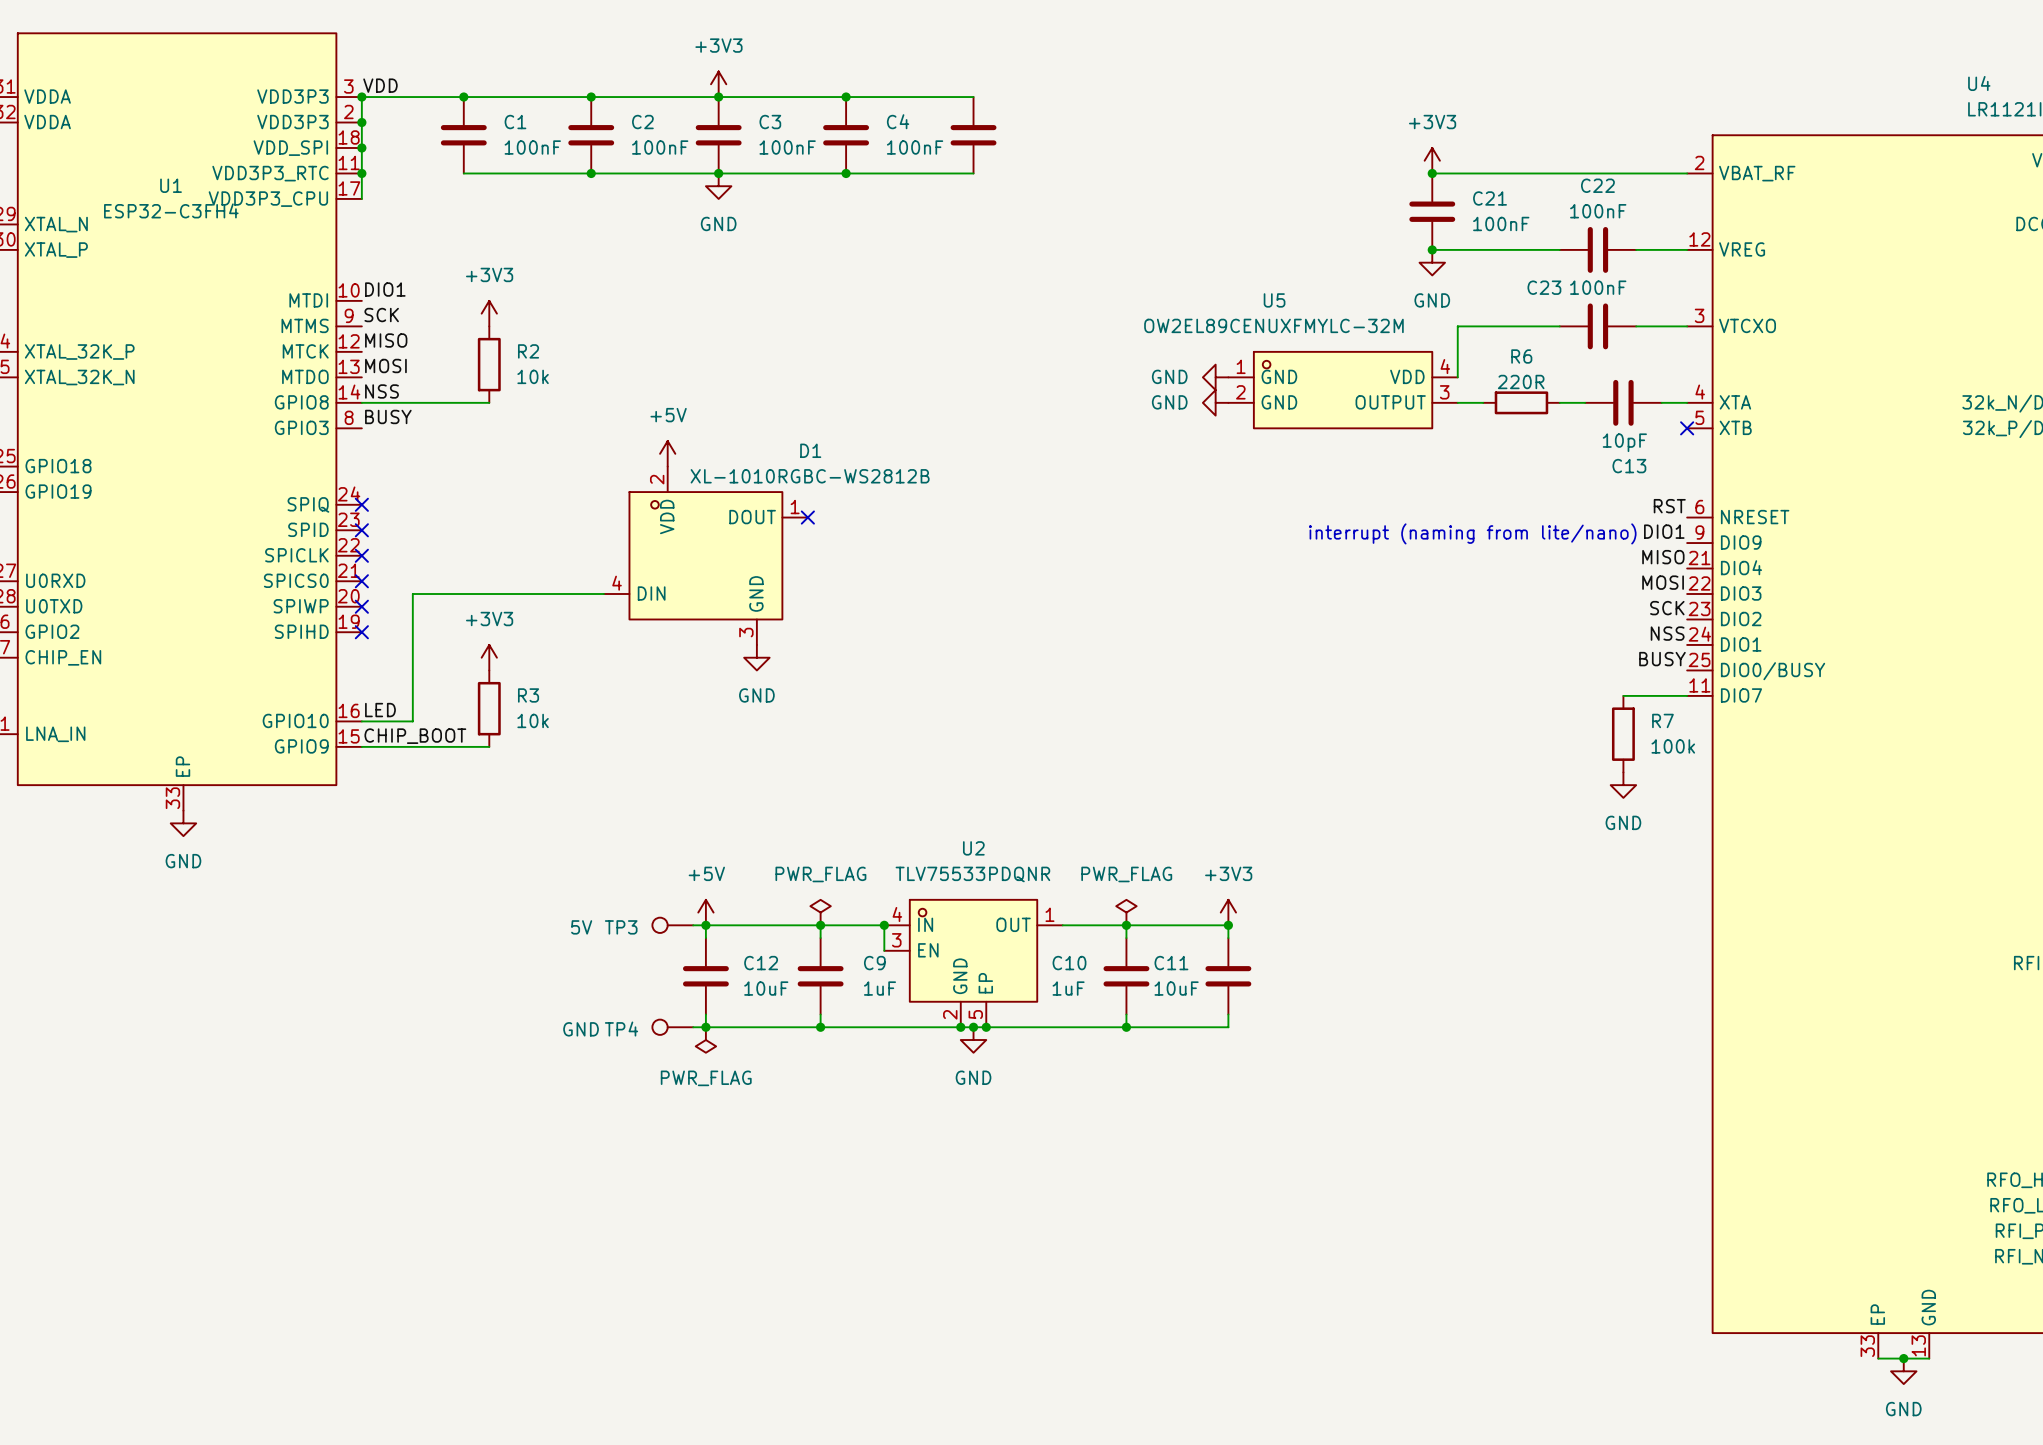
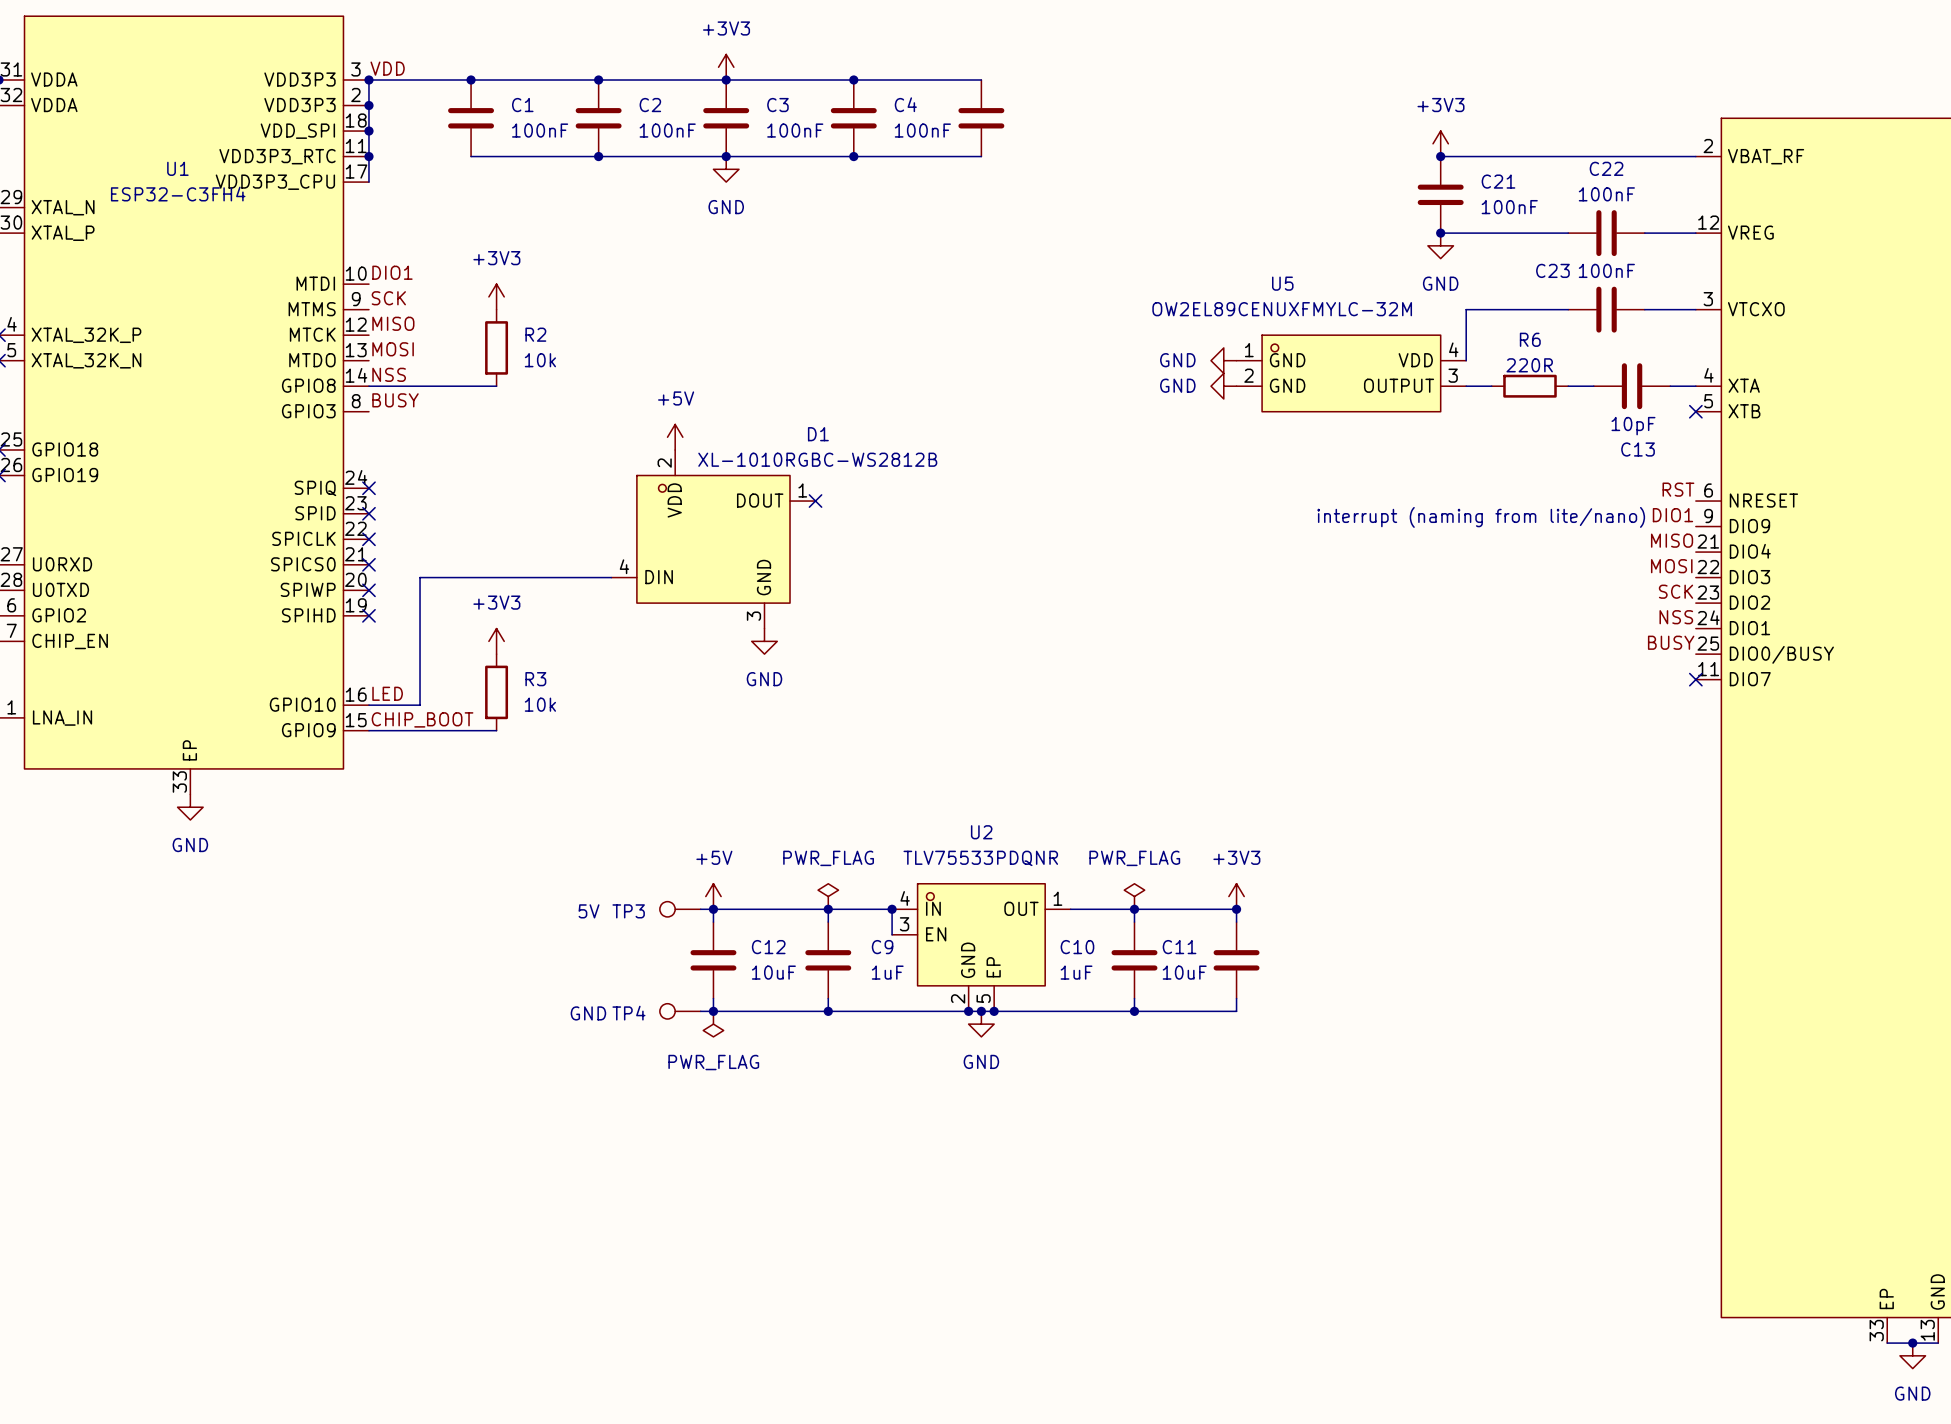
wire: (1623, 695) (1687, 695) -> none
no-connect mark: none -> (1695, 679)
R7: 100k (1623, 734) -> none
power symbol: GND (1623, 785) -> none

